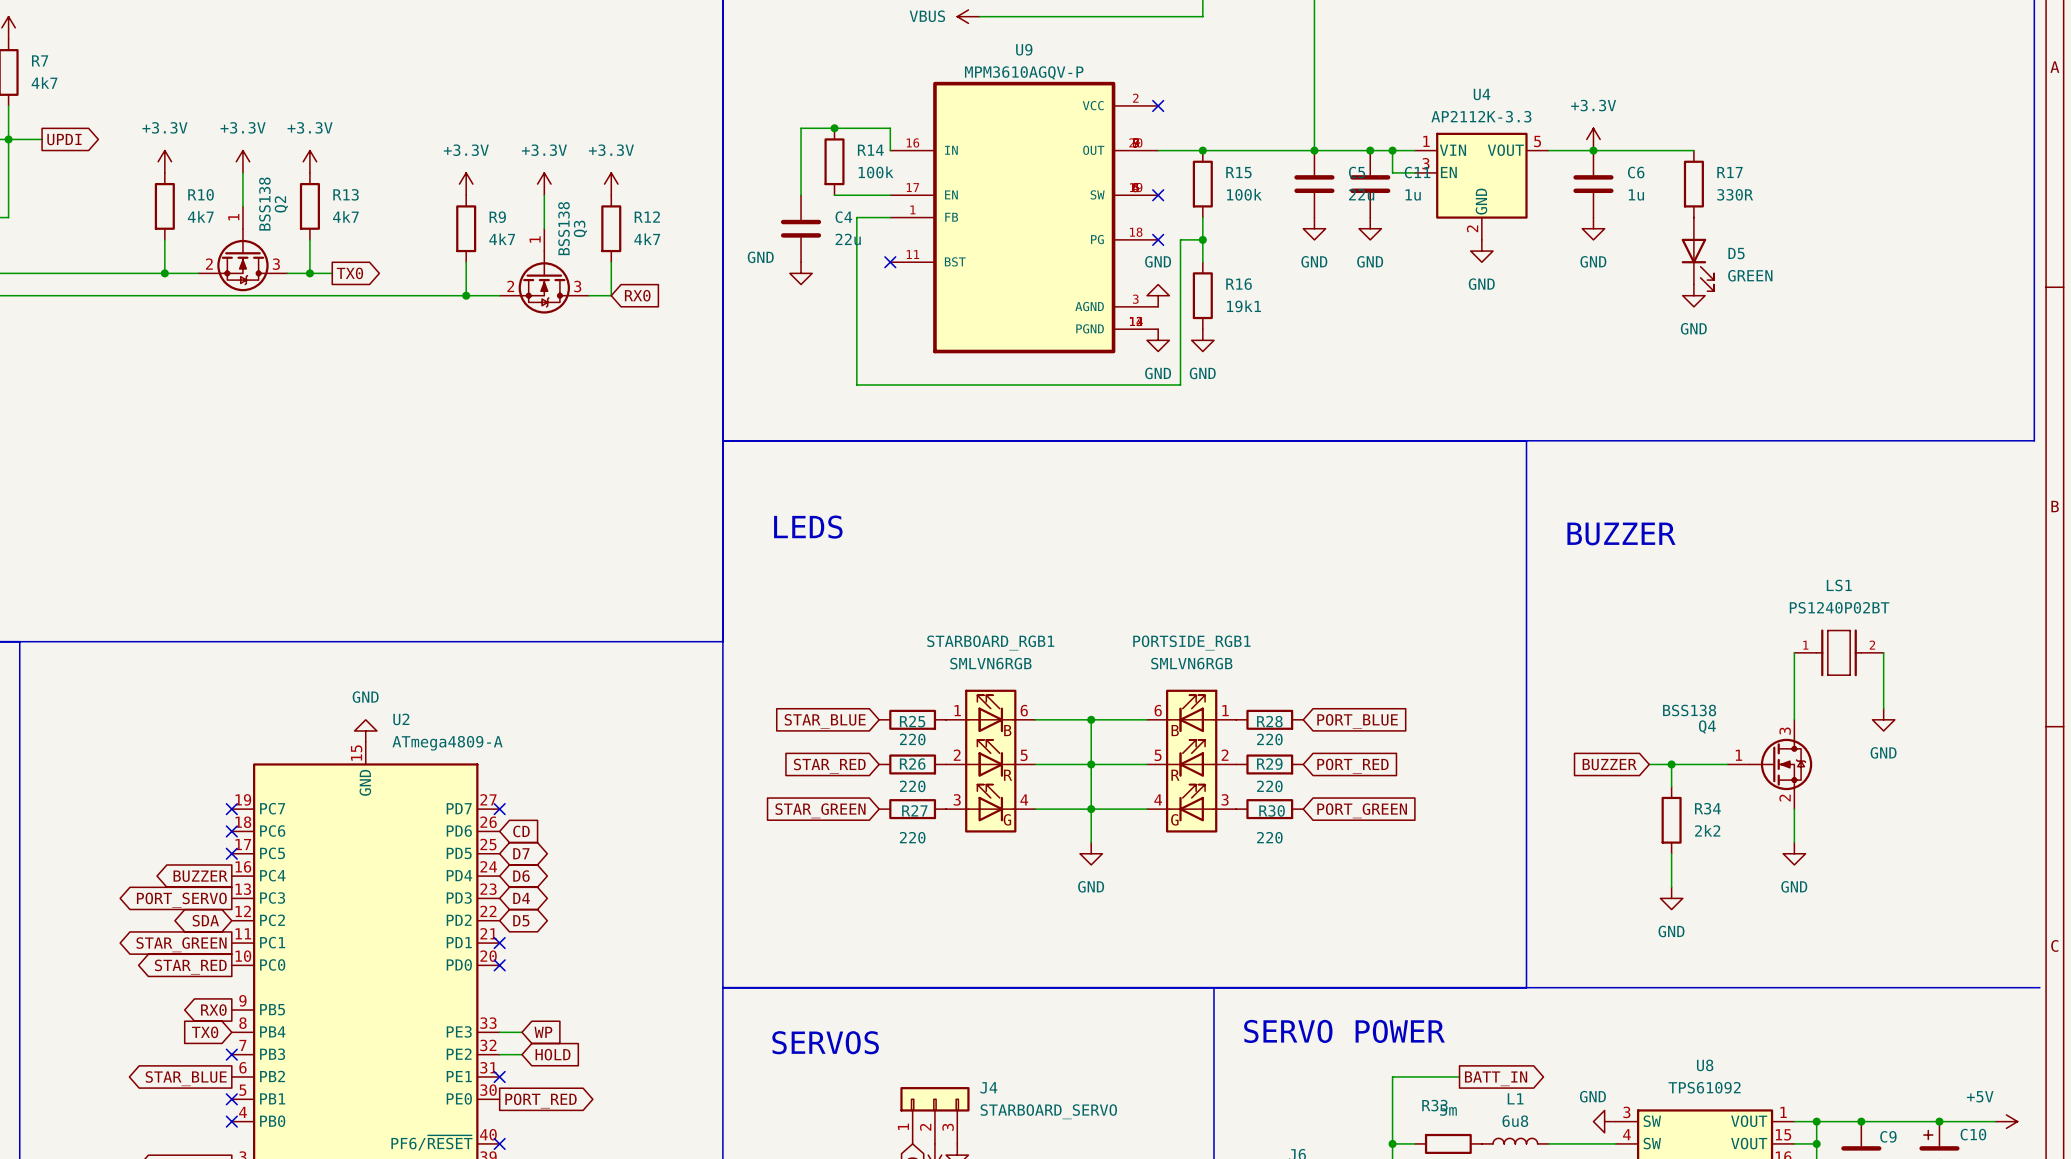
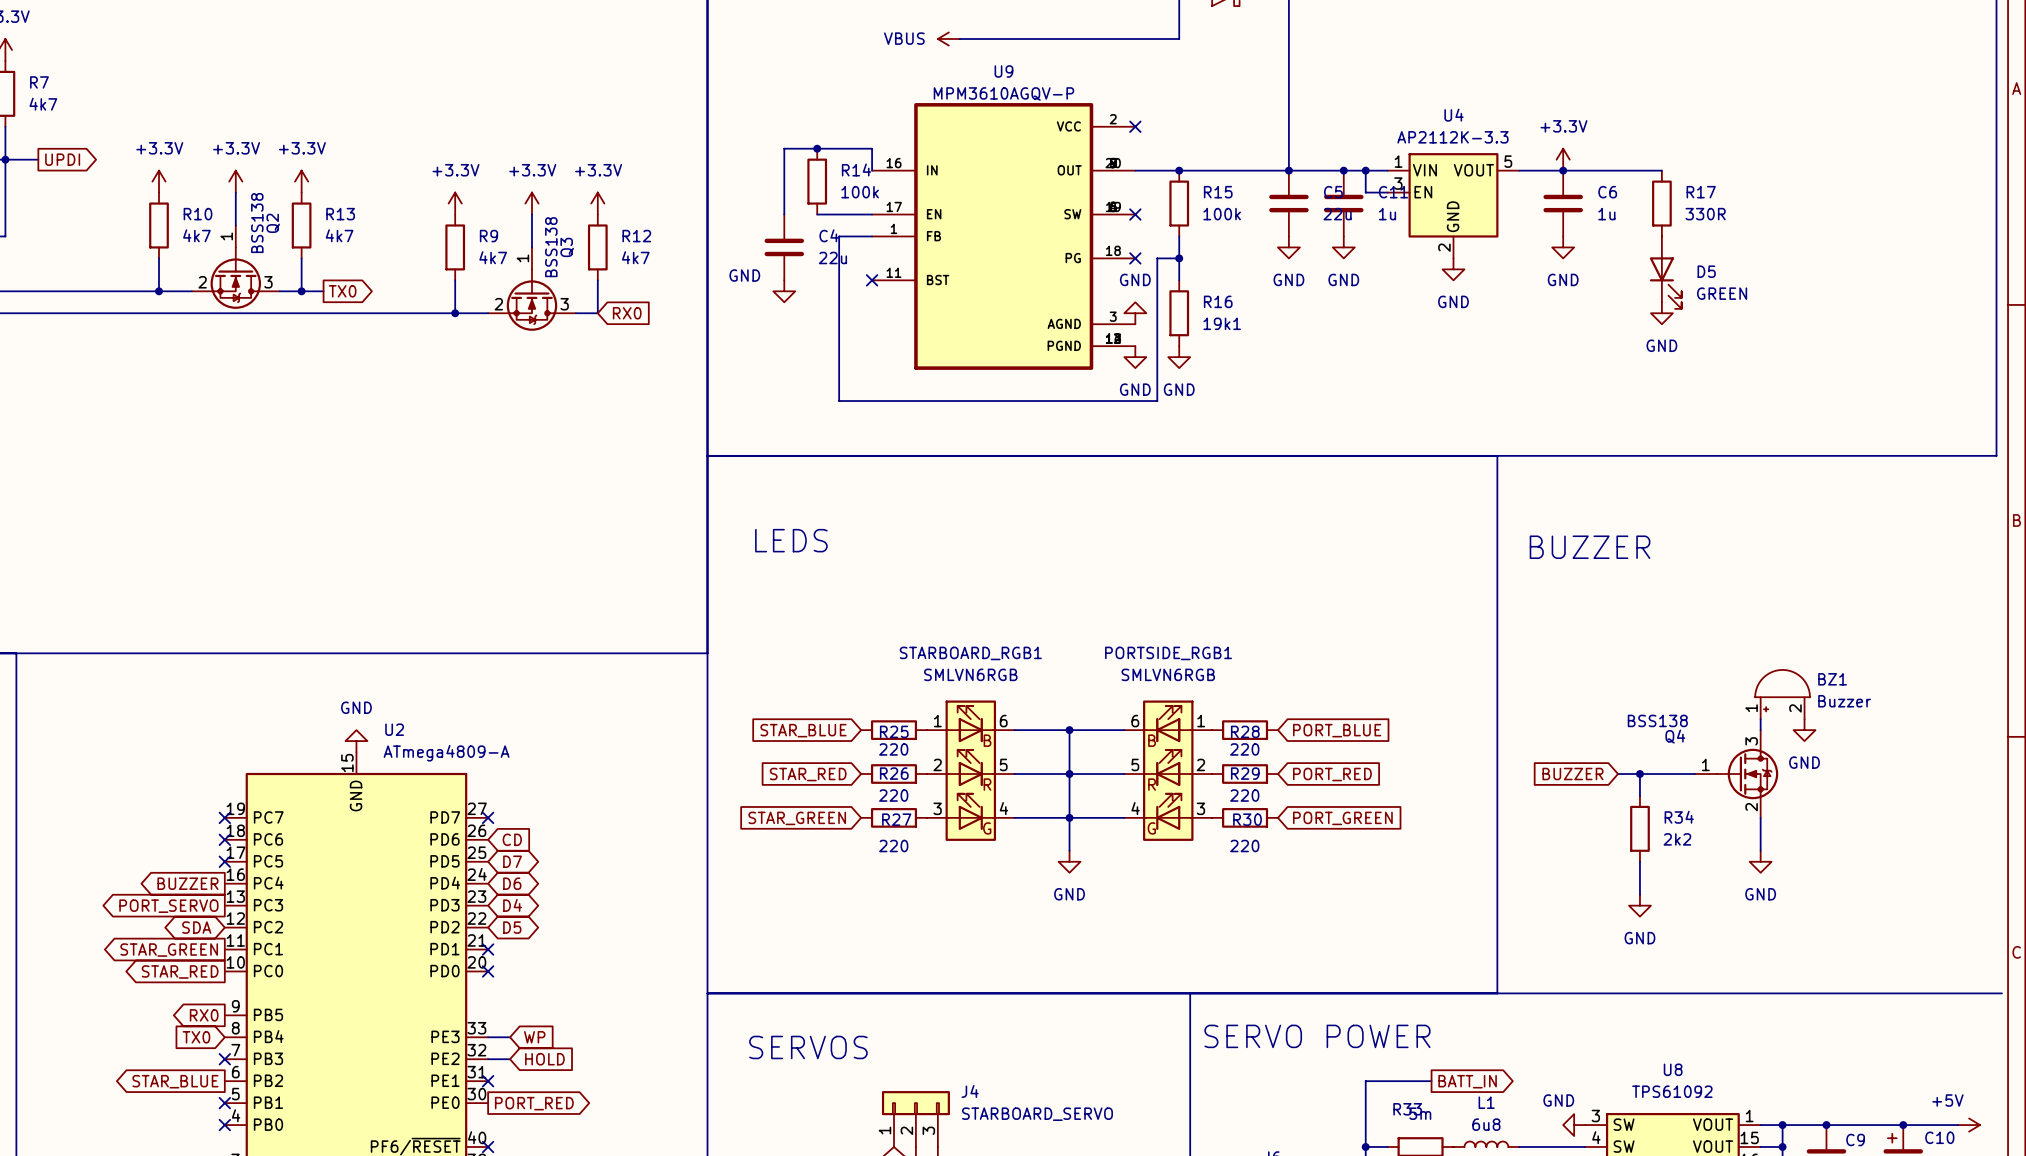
wire: (1794, 652) (1794, 708) -> none
LS1: PS1240P02BT (1839, 652) -> none
wire: (1883, 652) (1883, 708) -> none
BZ1: none -> Buzzer (1782, 694)
power symbol position: GND (1883, 719) -> GND (1804, 730)

